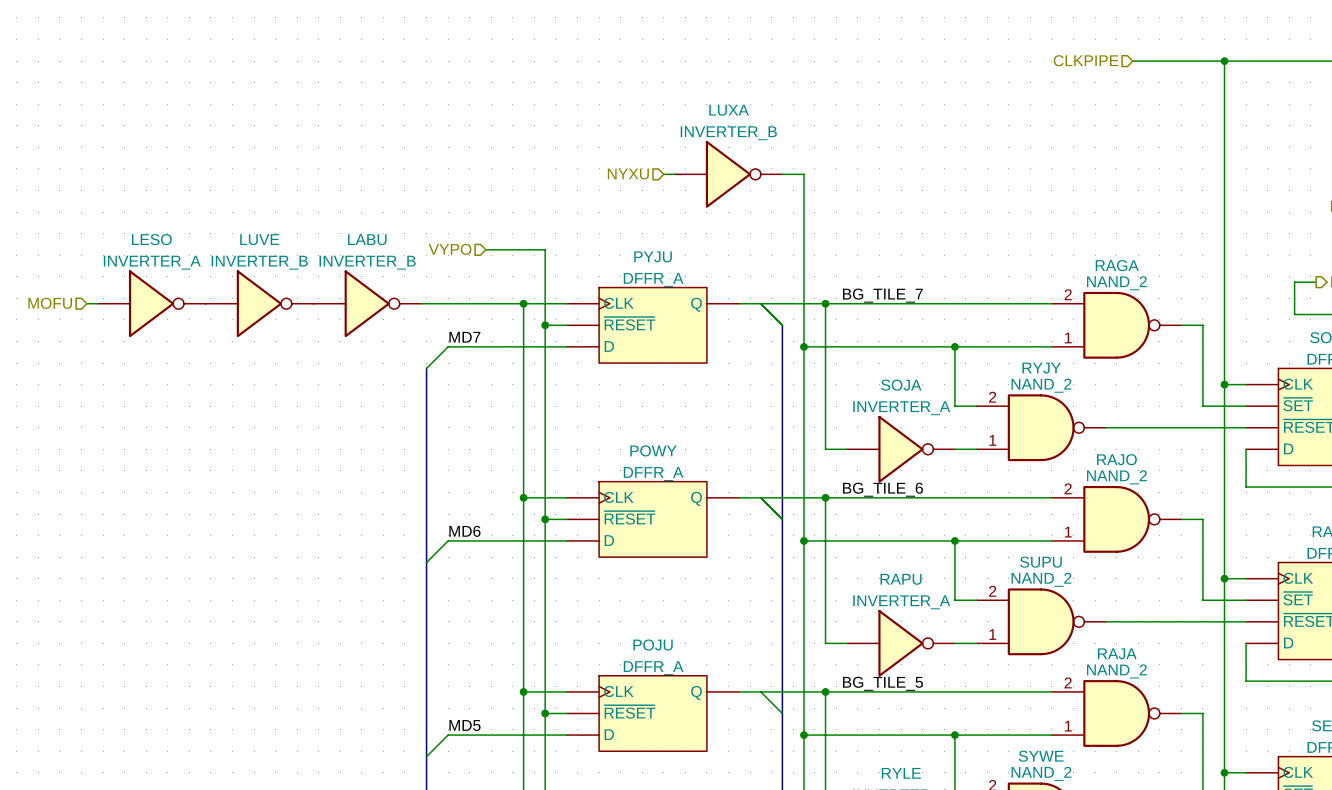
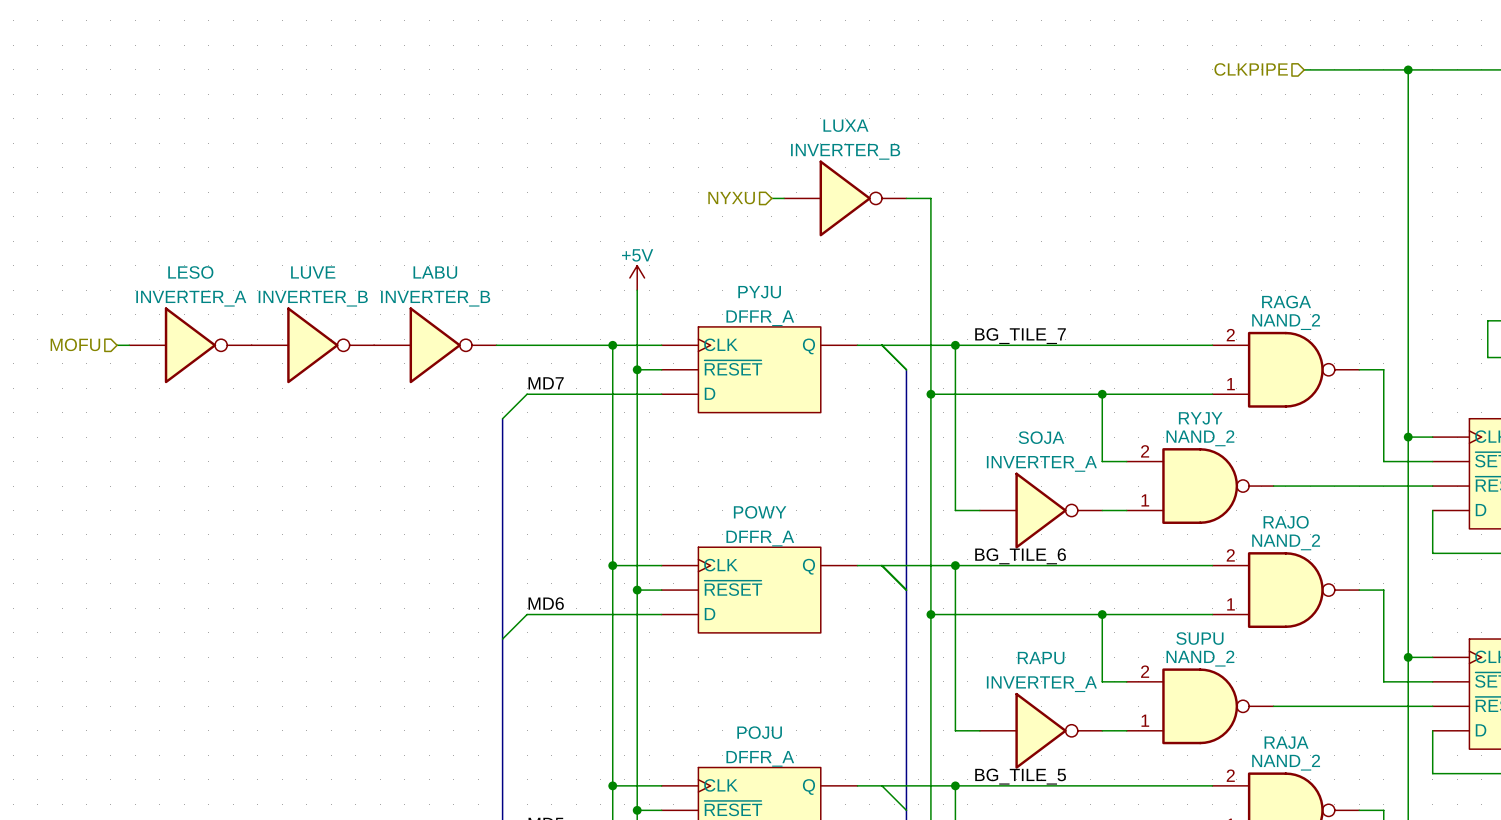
power symbol: none -> +5V (637, 277)
hierarchical label: VYPO (450, 249) -> none
wire: (485, 249) (545, 249) (545, 255) -> none

